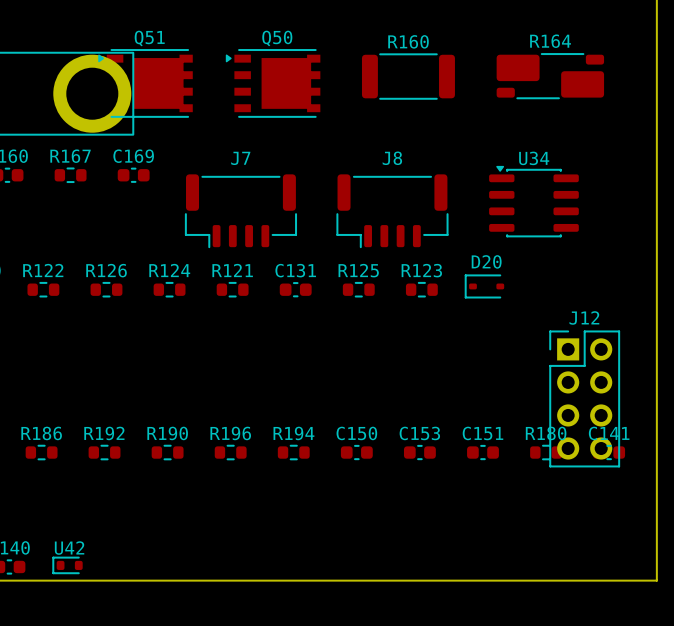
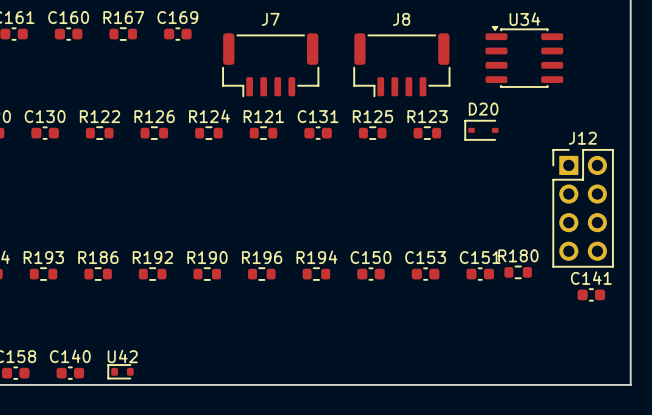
J12 position: (584, 398) -> (583, 208)
R180 position: (546, 452) -> (518, 272)
C141 position: (609, 452) -> (591, 294)

